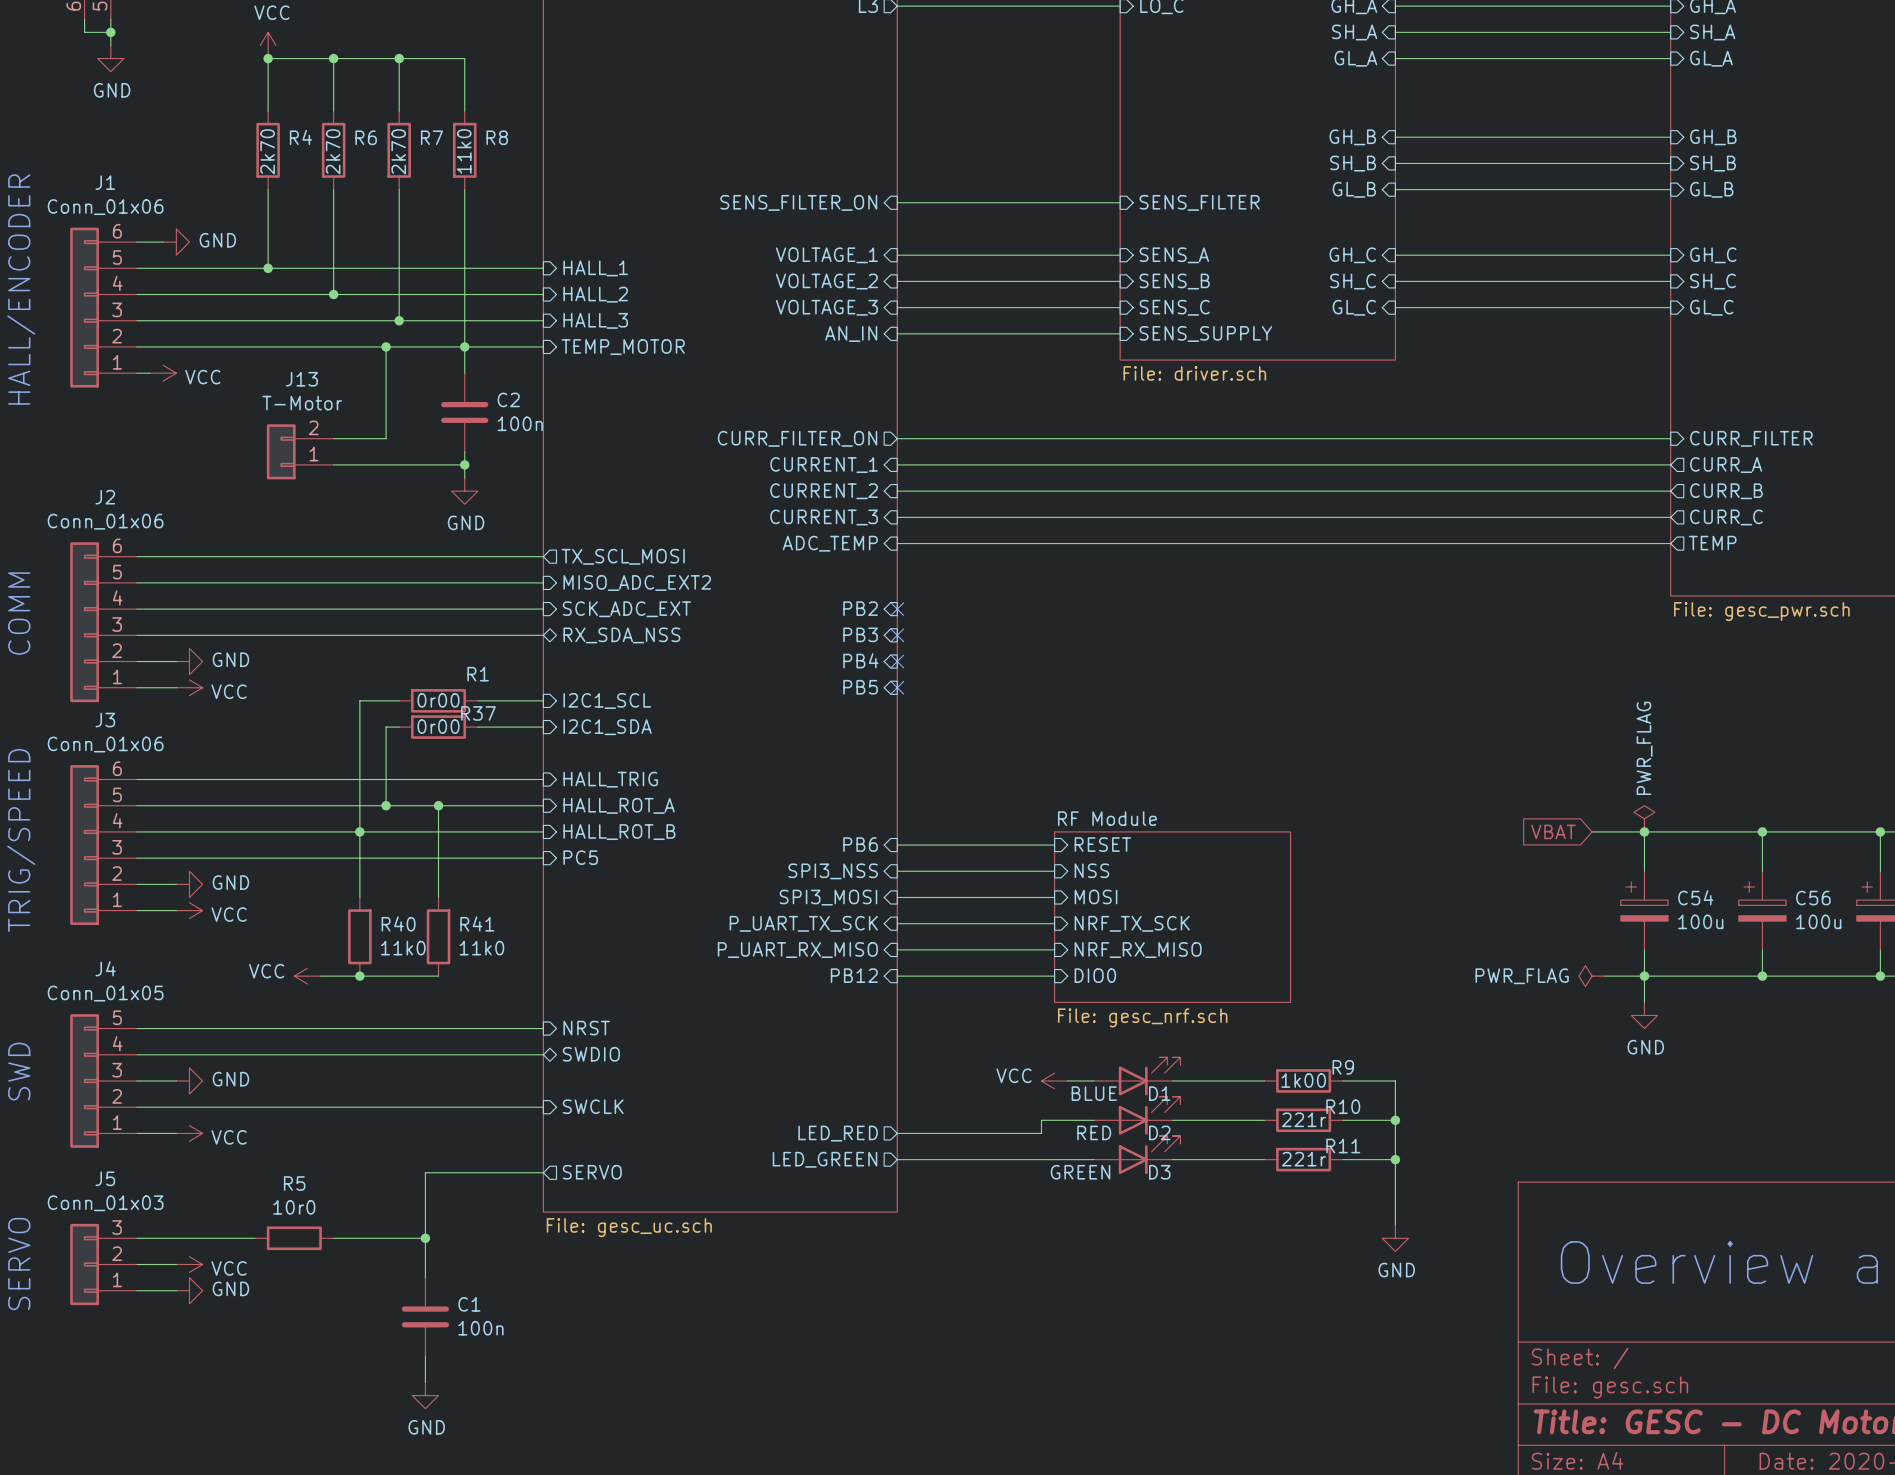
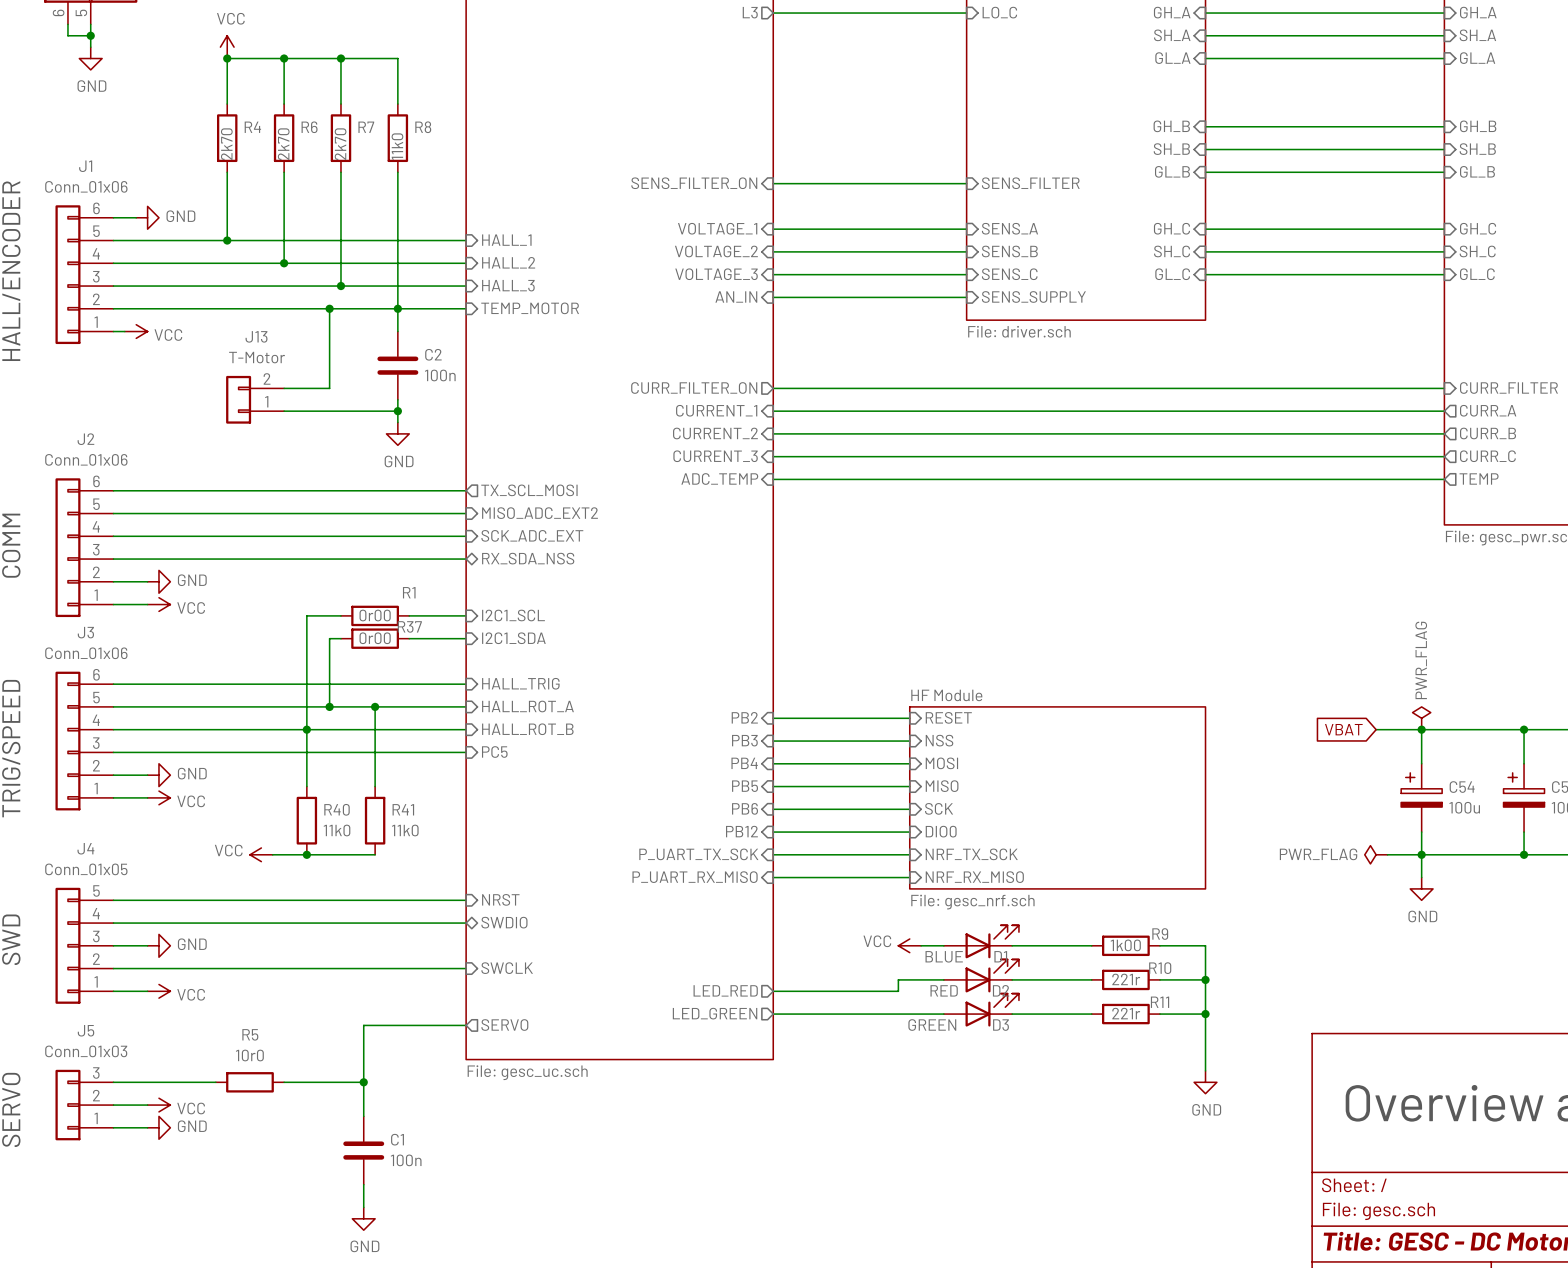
sheet pin position: PB2 (860, 608) -> PB2 (744, 717)
no-connect mark: (897, 609) -> none
sheet pin: PB3 (860, 634) -> none
no-connect mark: (897, 635) -> none
sheet pin: PB4 (860, 660) -> none
no-connect mark: (897, 661) -> none
sheet pin: PB5 (860, 687) -> none
no-connect mark: (897, 687) -> none
wire: none -> (773, 718) (909, 718)
sheet pin: none -> RESET (948, 717)
sheet pin: PB6 (860, 844) -> PB3 (744, 740)
sheet pin: RESET (1102, 844) -> NSS (939, 740)
sheet pin: NSS (1091, 870) -> MOSI (941, 763)
sheet pin: SPI3_NSS (833, 871) -> PB4 (744, 763)
sheet pin: MOSI (1095, 896) -> MISO (942, 786)
sheet pin: SPI3_MOSI (828, 897) -> PB5 (745, 786)
sheet HF Module: none -> File: gesc_nrf.sch (1057, 797)
sheet RF Module: File: gesc_nrf.sch (1172, 917) -> none
sheet pin: P_UART_TX_SCK (803, 923) -> PB6 (745, 808)
sheet pin: NRF_TX_SCK (1132, 923) -> SCK (939, 808)
sheet pin: P_UART_RX_MISO (797, 950) -> PB12 (741, 831)
sheet pin: NRF_RX_MISO (1138, 950) -> DIO0 (941, 831)
sheet pin: PB12 (854, 975) -> P_UART_TX_SCK (698, 854)
sheet pin: DIO0 (1095, 975) -> NRF_TX_SCK (971, 854)
sheet pin: none -> P_UART_RX_MISO (695, 877)
wire: none -> (773, 877) (909, 877)
sheet pin: none -> NRF_RX_MISO (974, 877)

